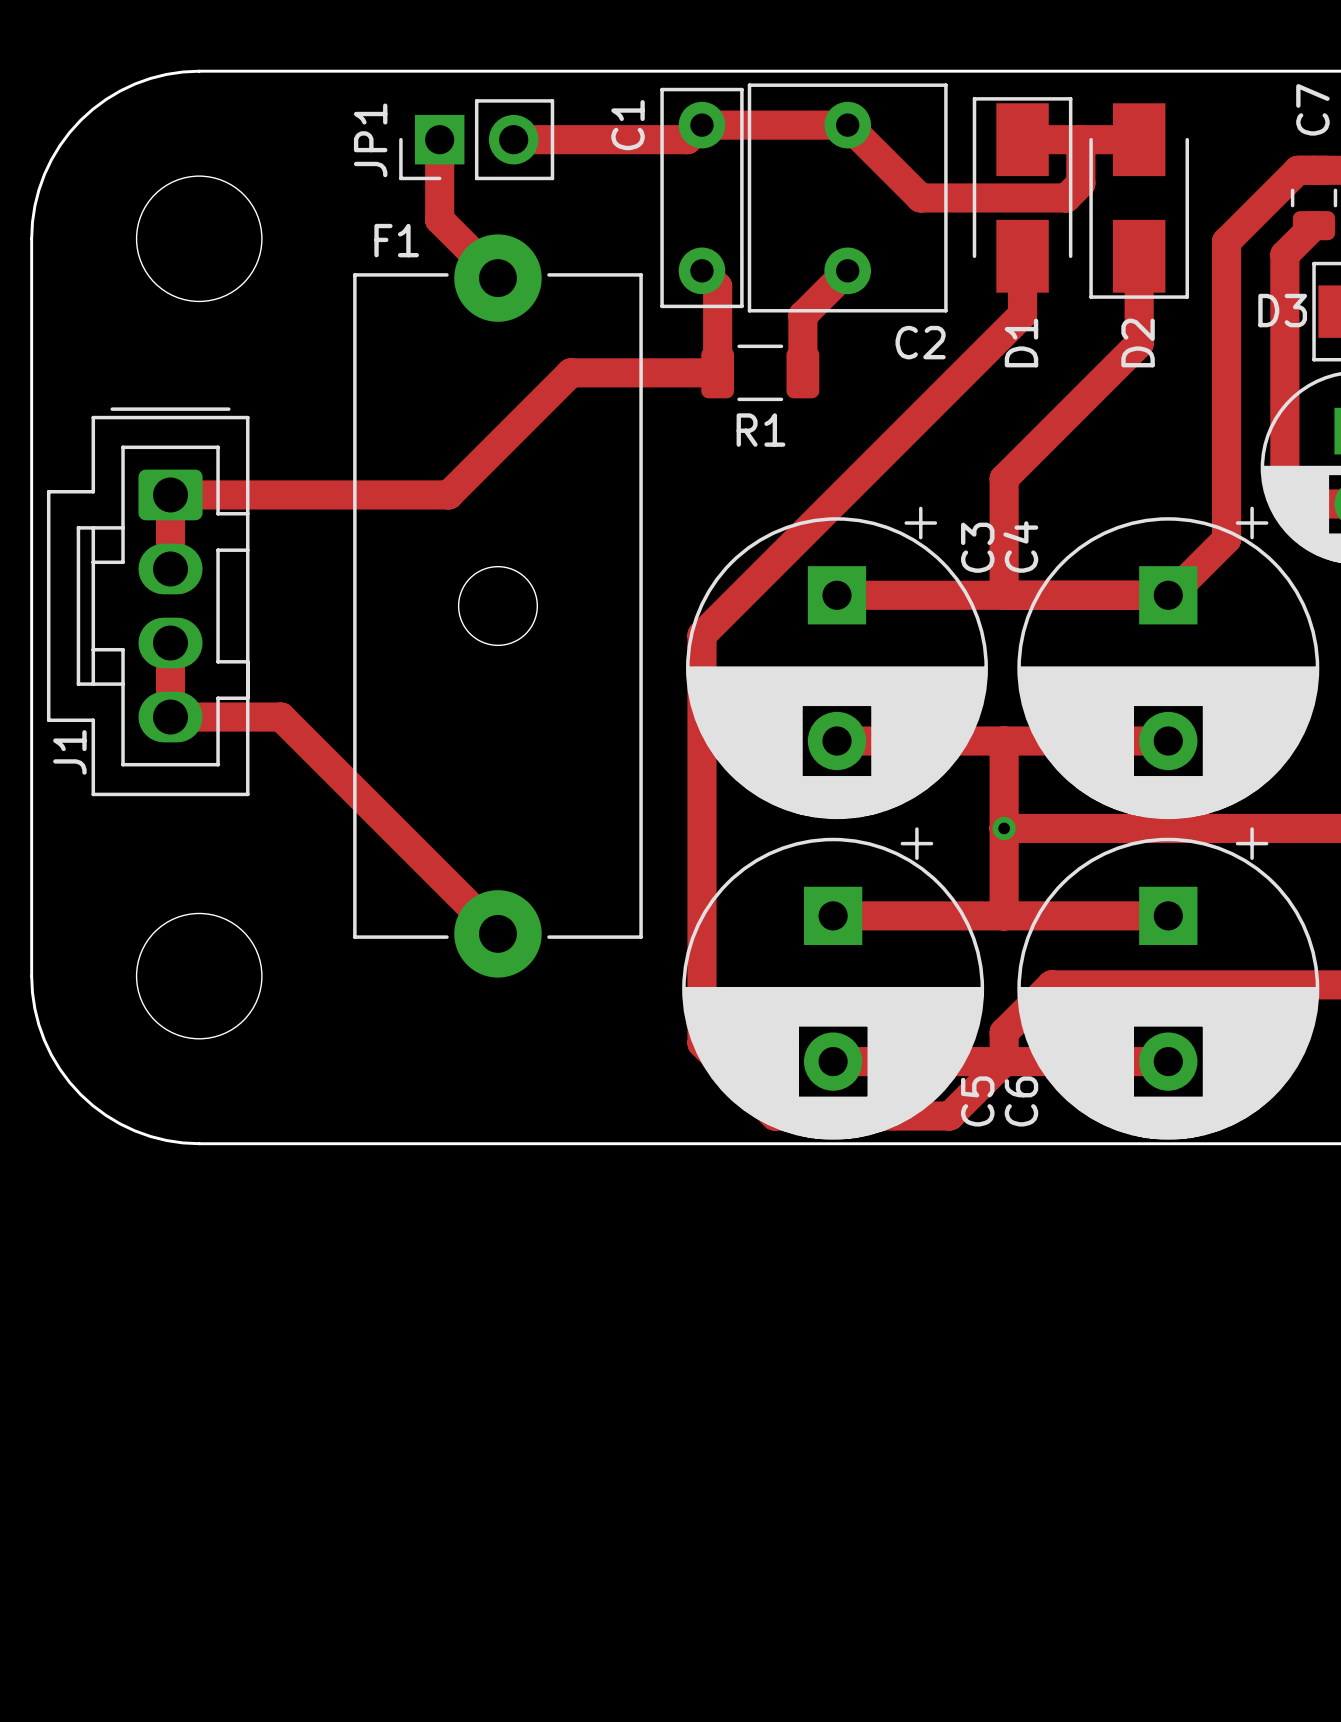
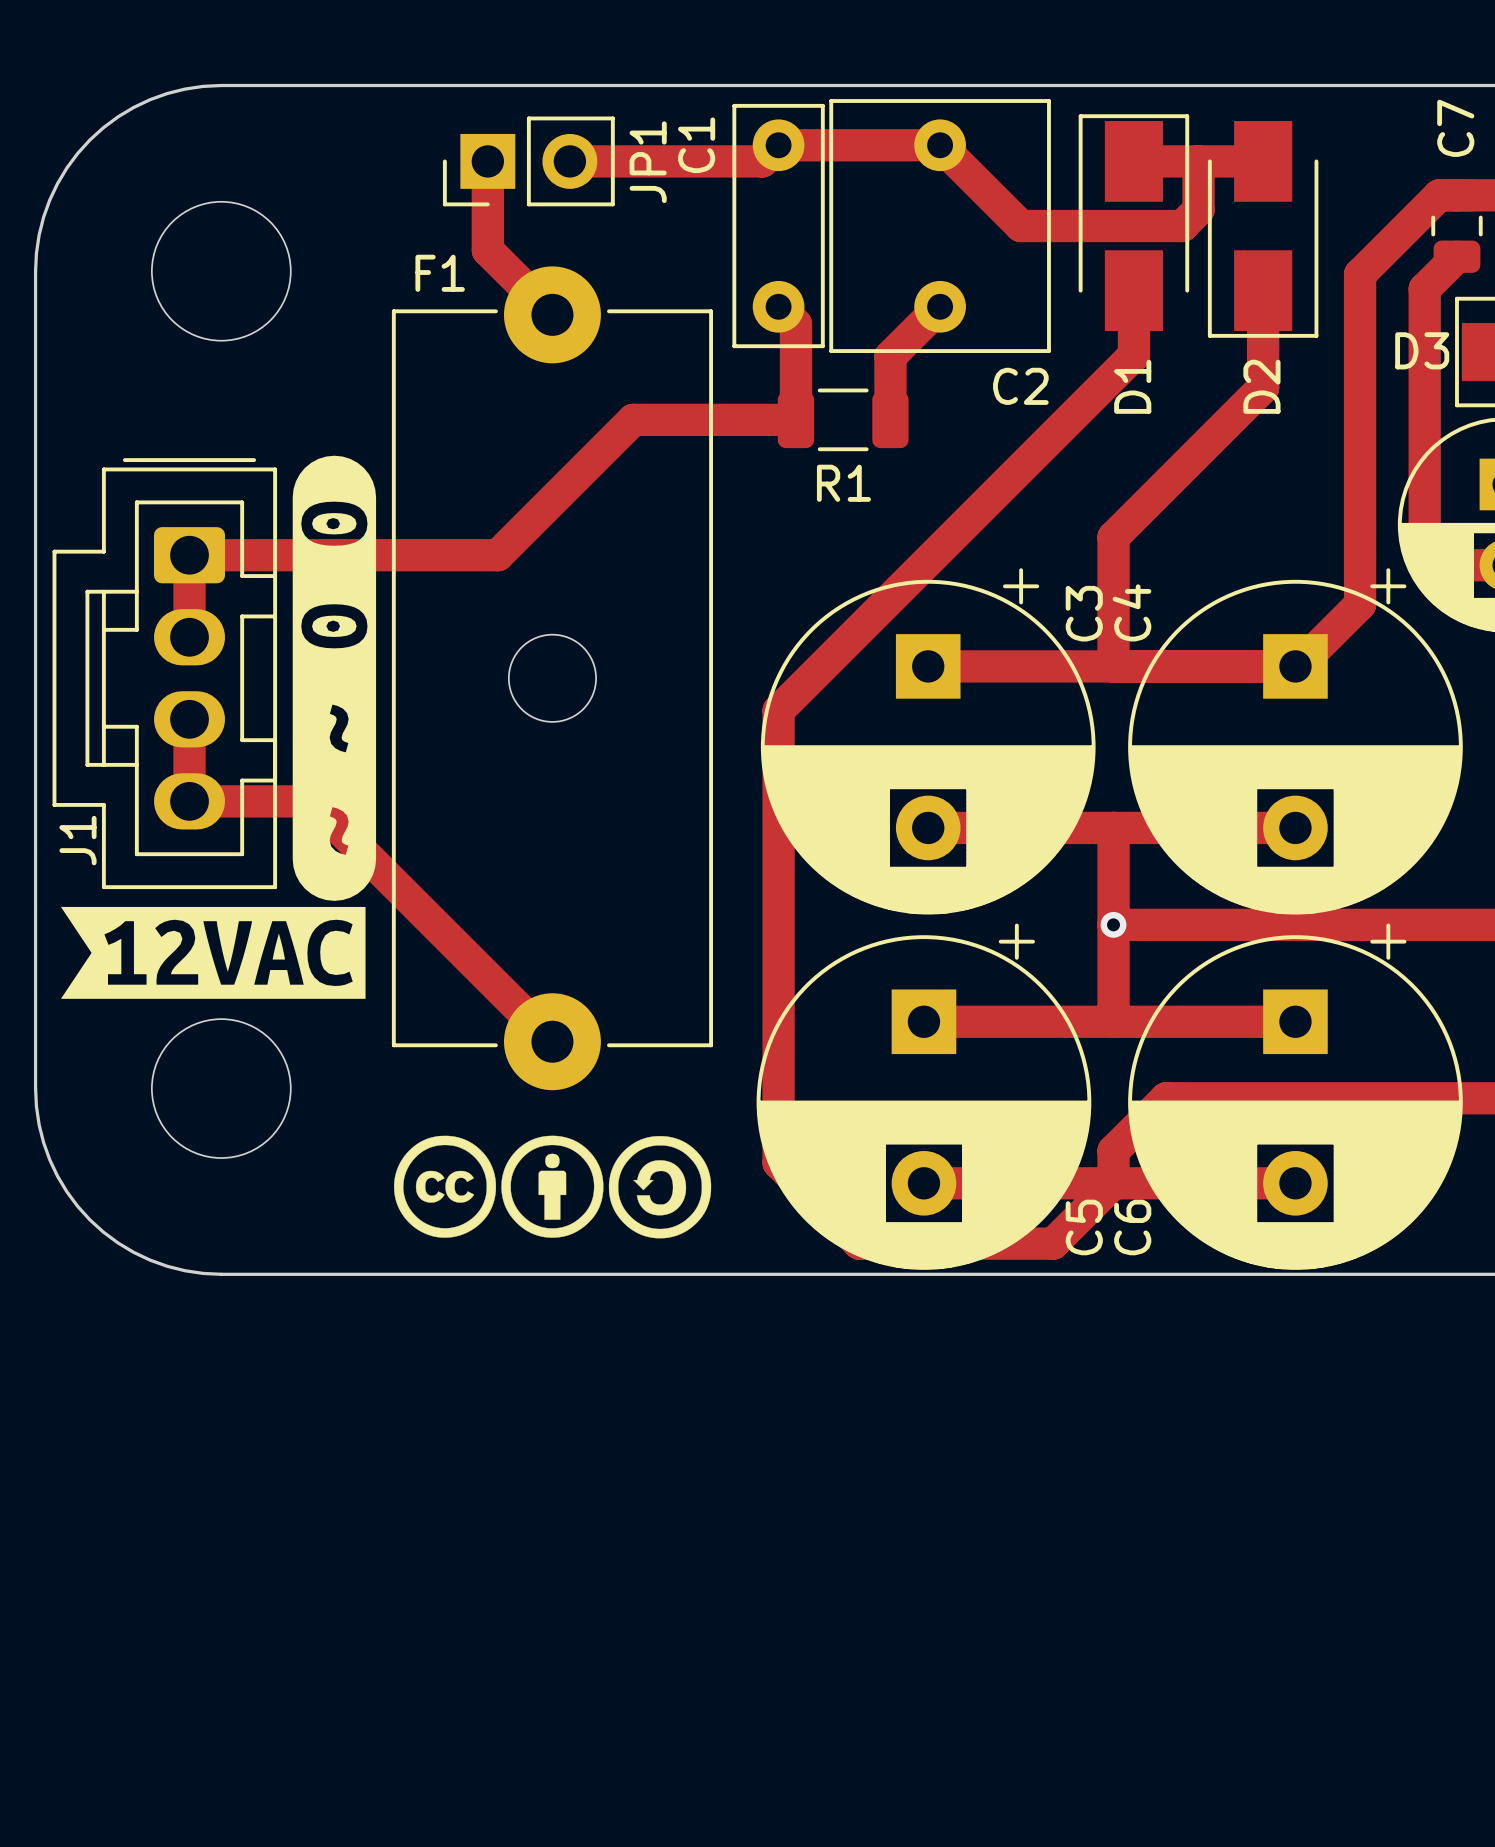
JP1 name position: JP1 (370, 140) -> JP1 (648, 162)
drawing: none -> [60, 455, 377, 999]
drawing: none -> [394, 1135, 712, 1239]

